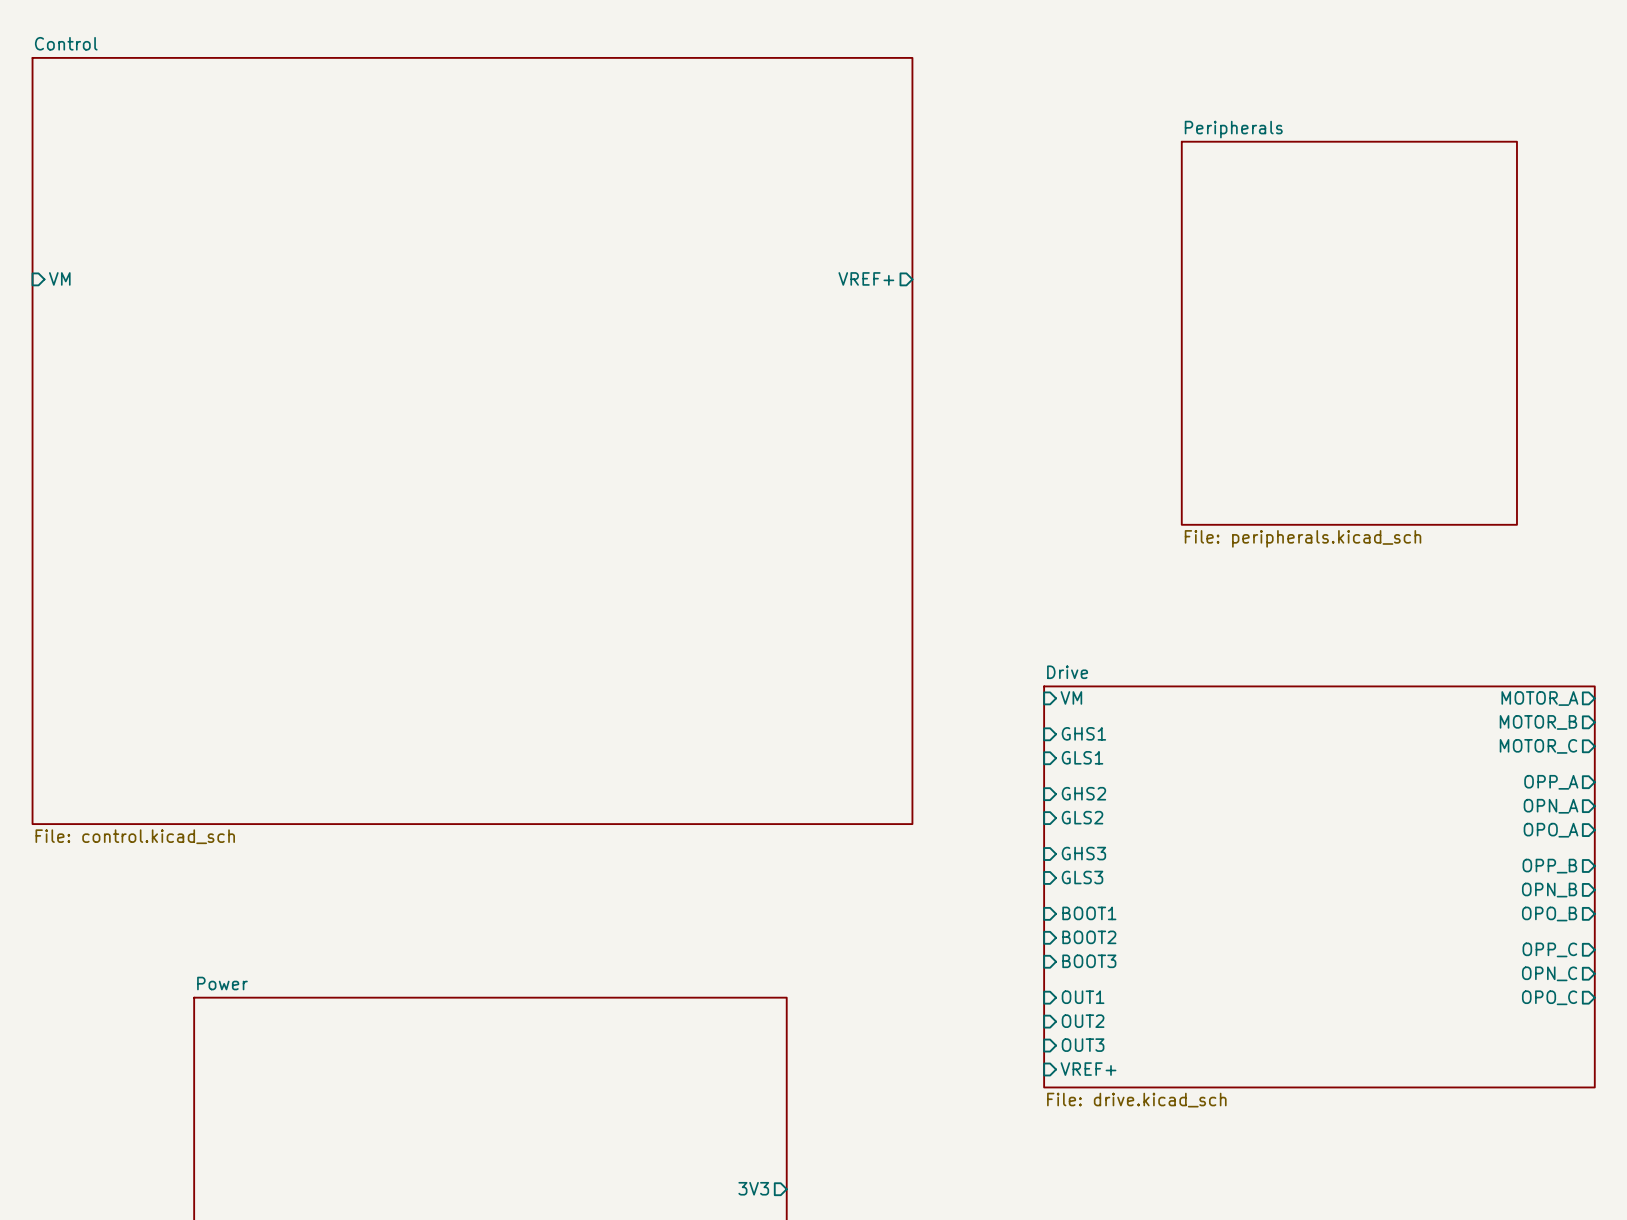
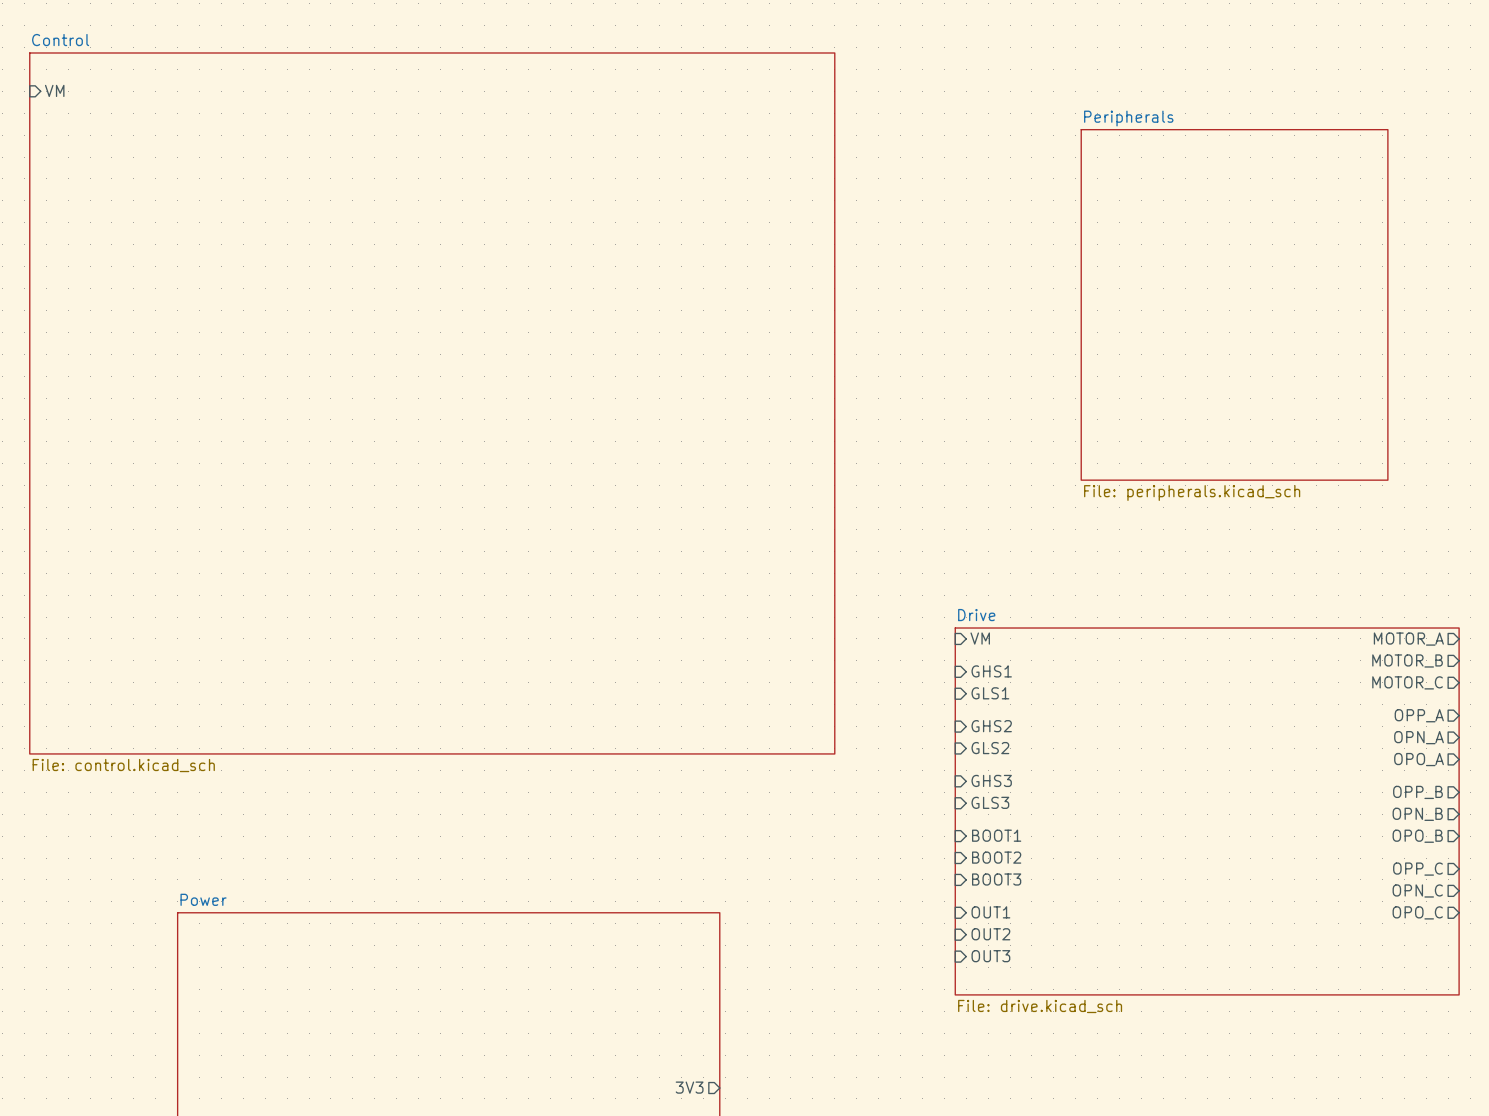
sheet pin position: VM (59, 278) -> VM (54, 90)
sheet pin: VREF+ (866, 278) -> none
sheet pin: VREF+ (1088, 1069) -> none

